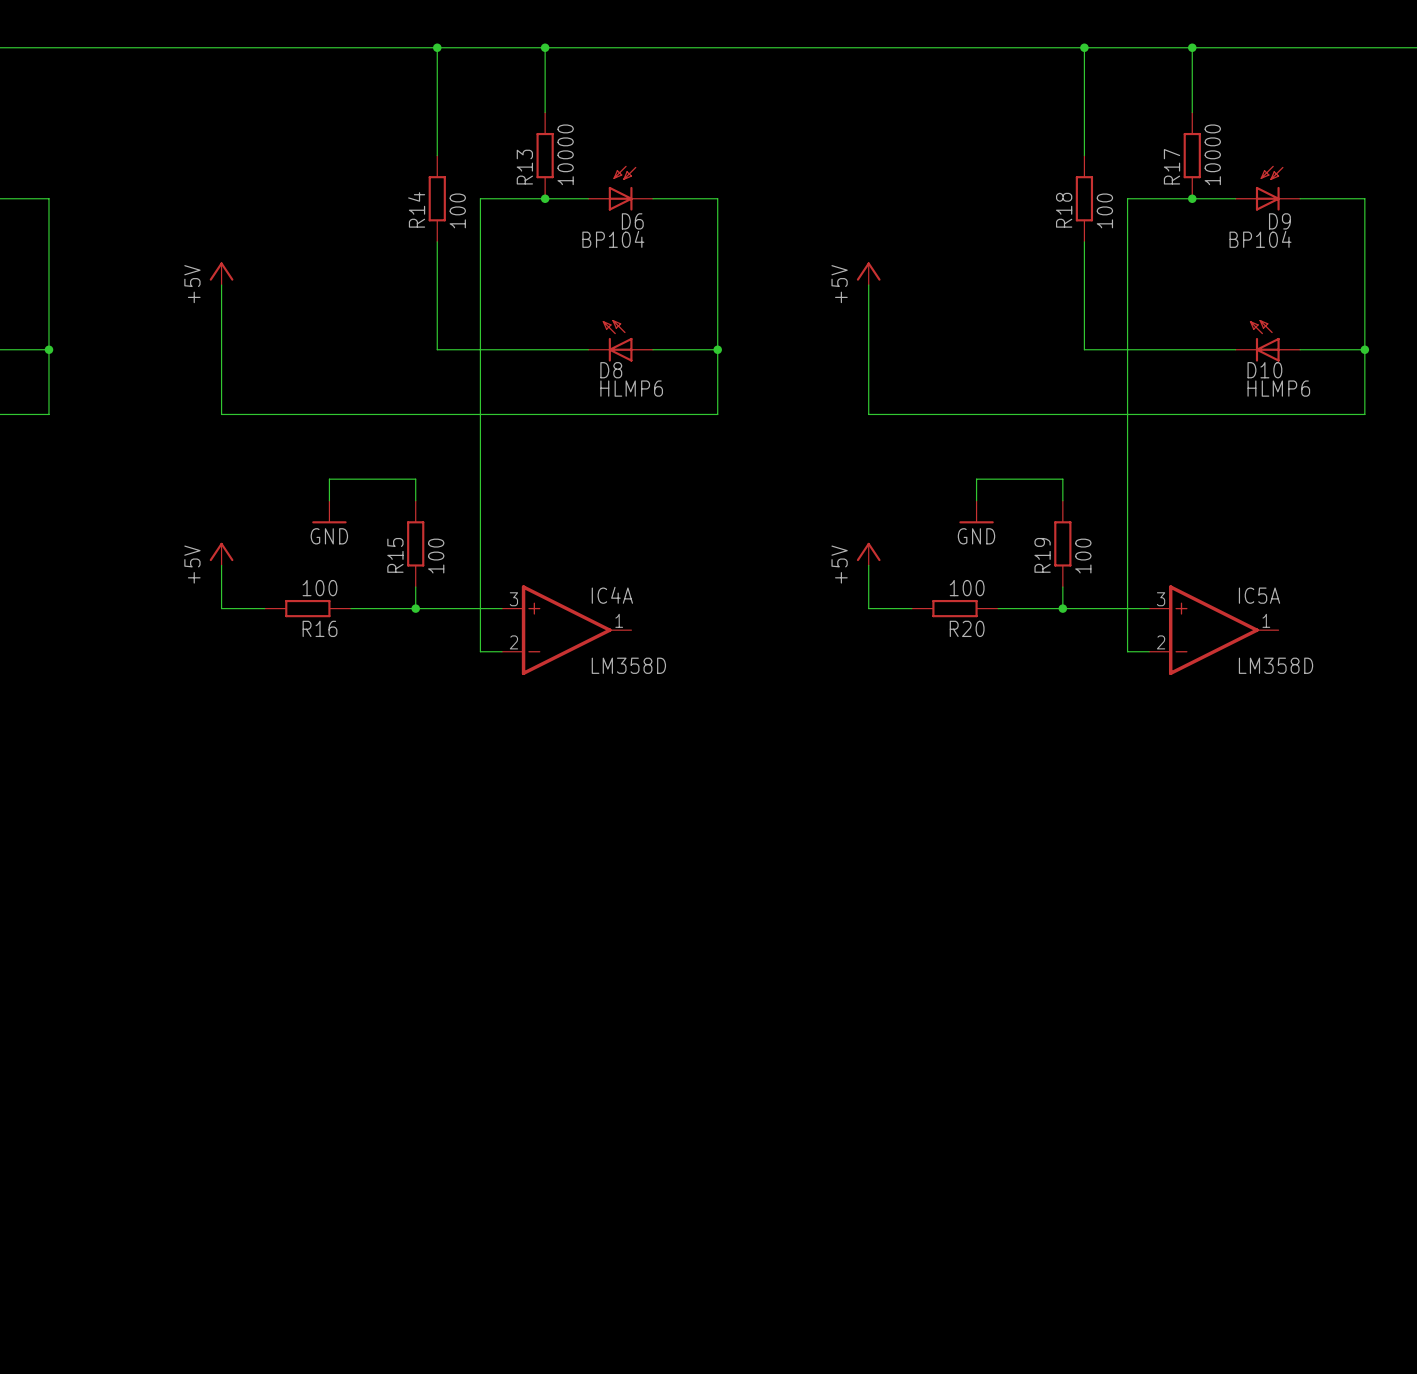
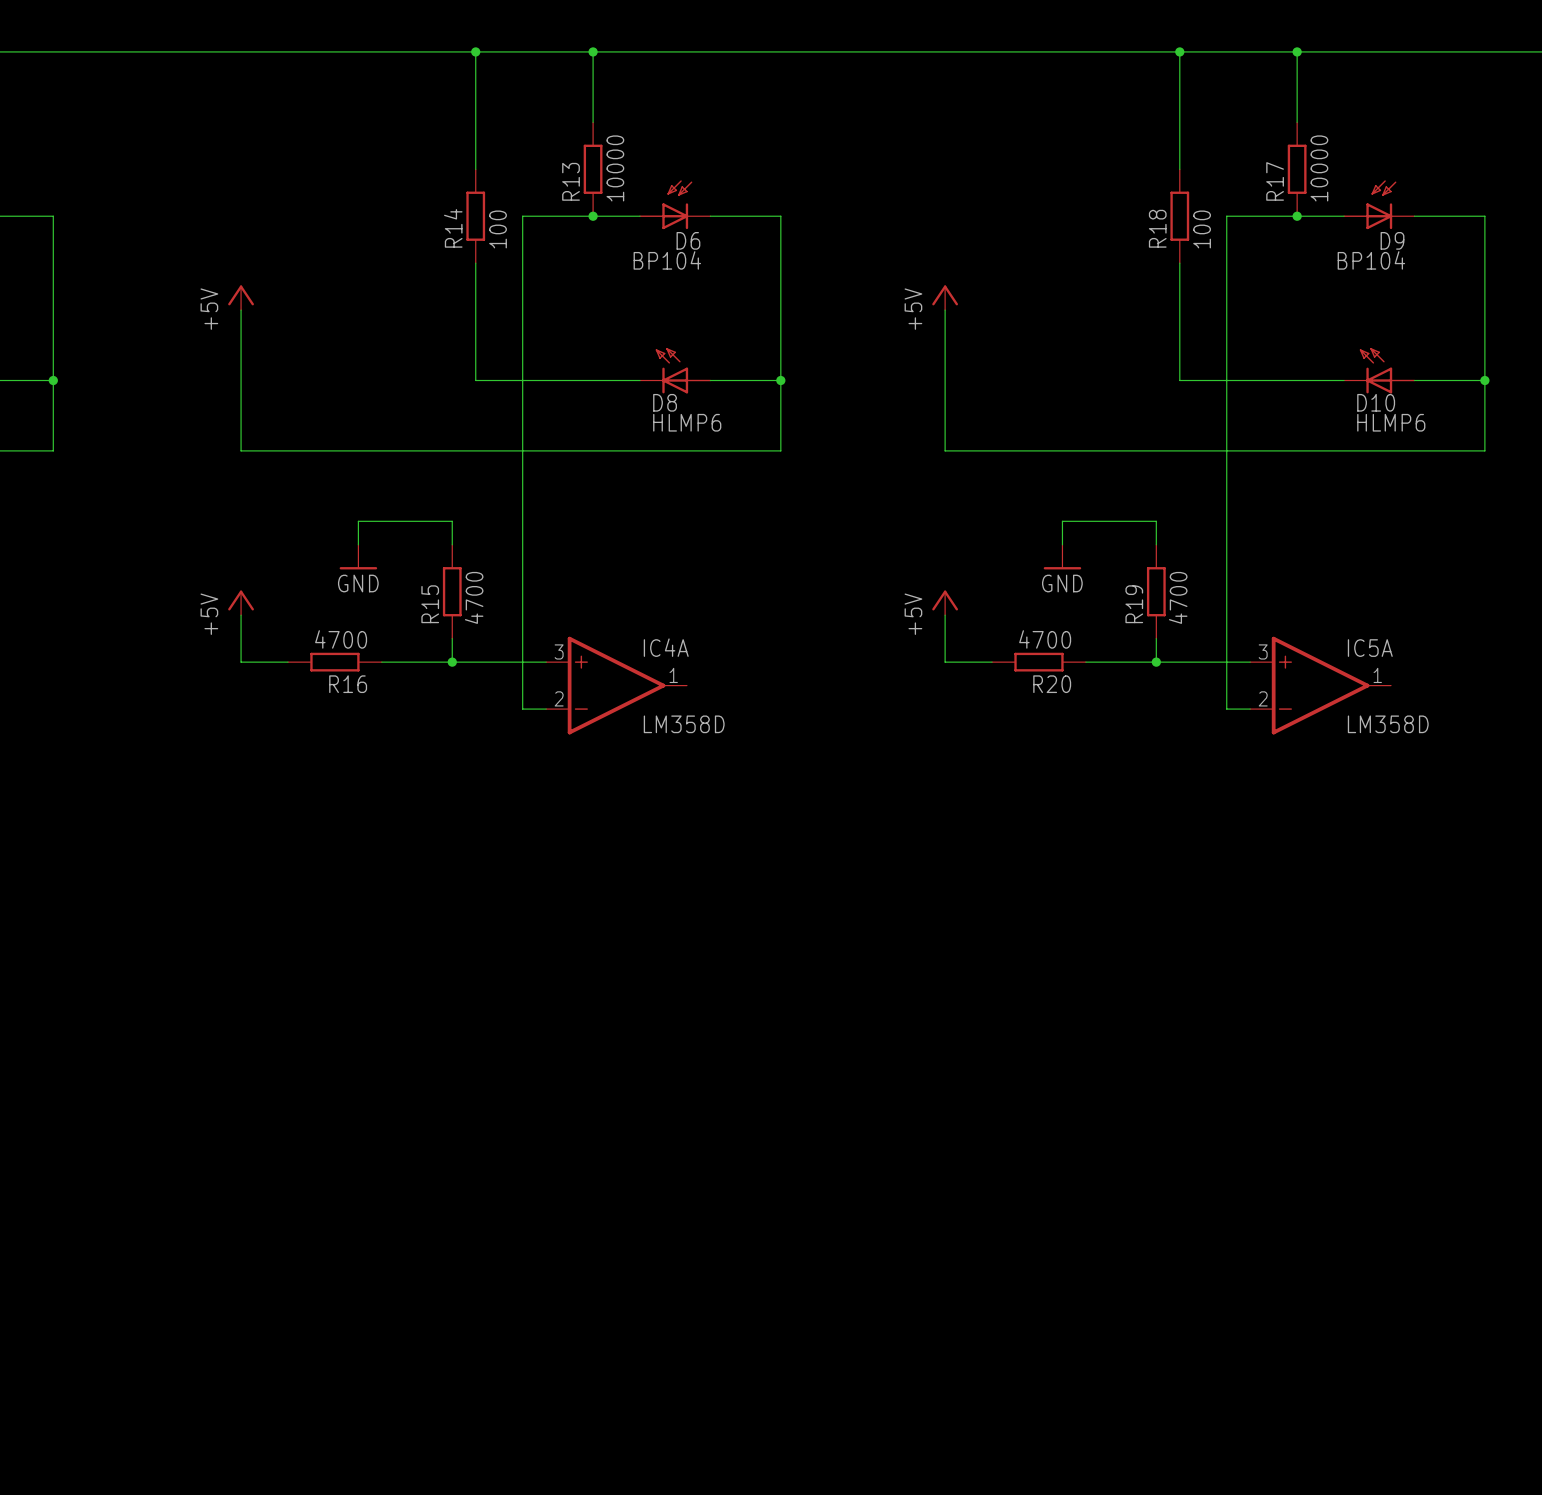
R15 value: 100 (436, 556) -> 4700 (474, 597)
R19 value: 100 (1083, 556) -> 4700 (1178, 597)
R16 value: 100 (320, 588) -> 4700 (341, 639)
R20 value: 100 (967, 588) -> 4700 (1045, 639)

